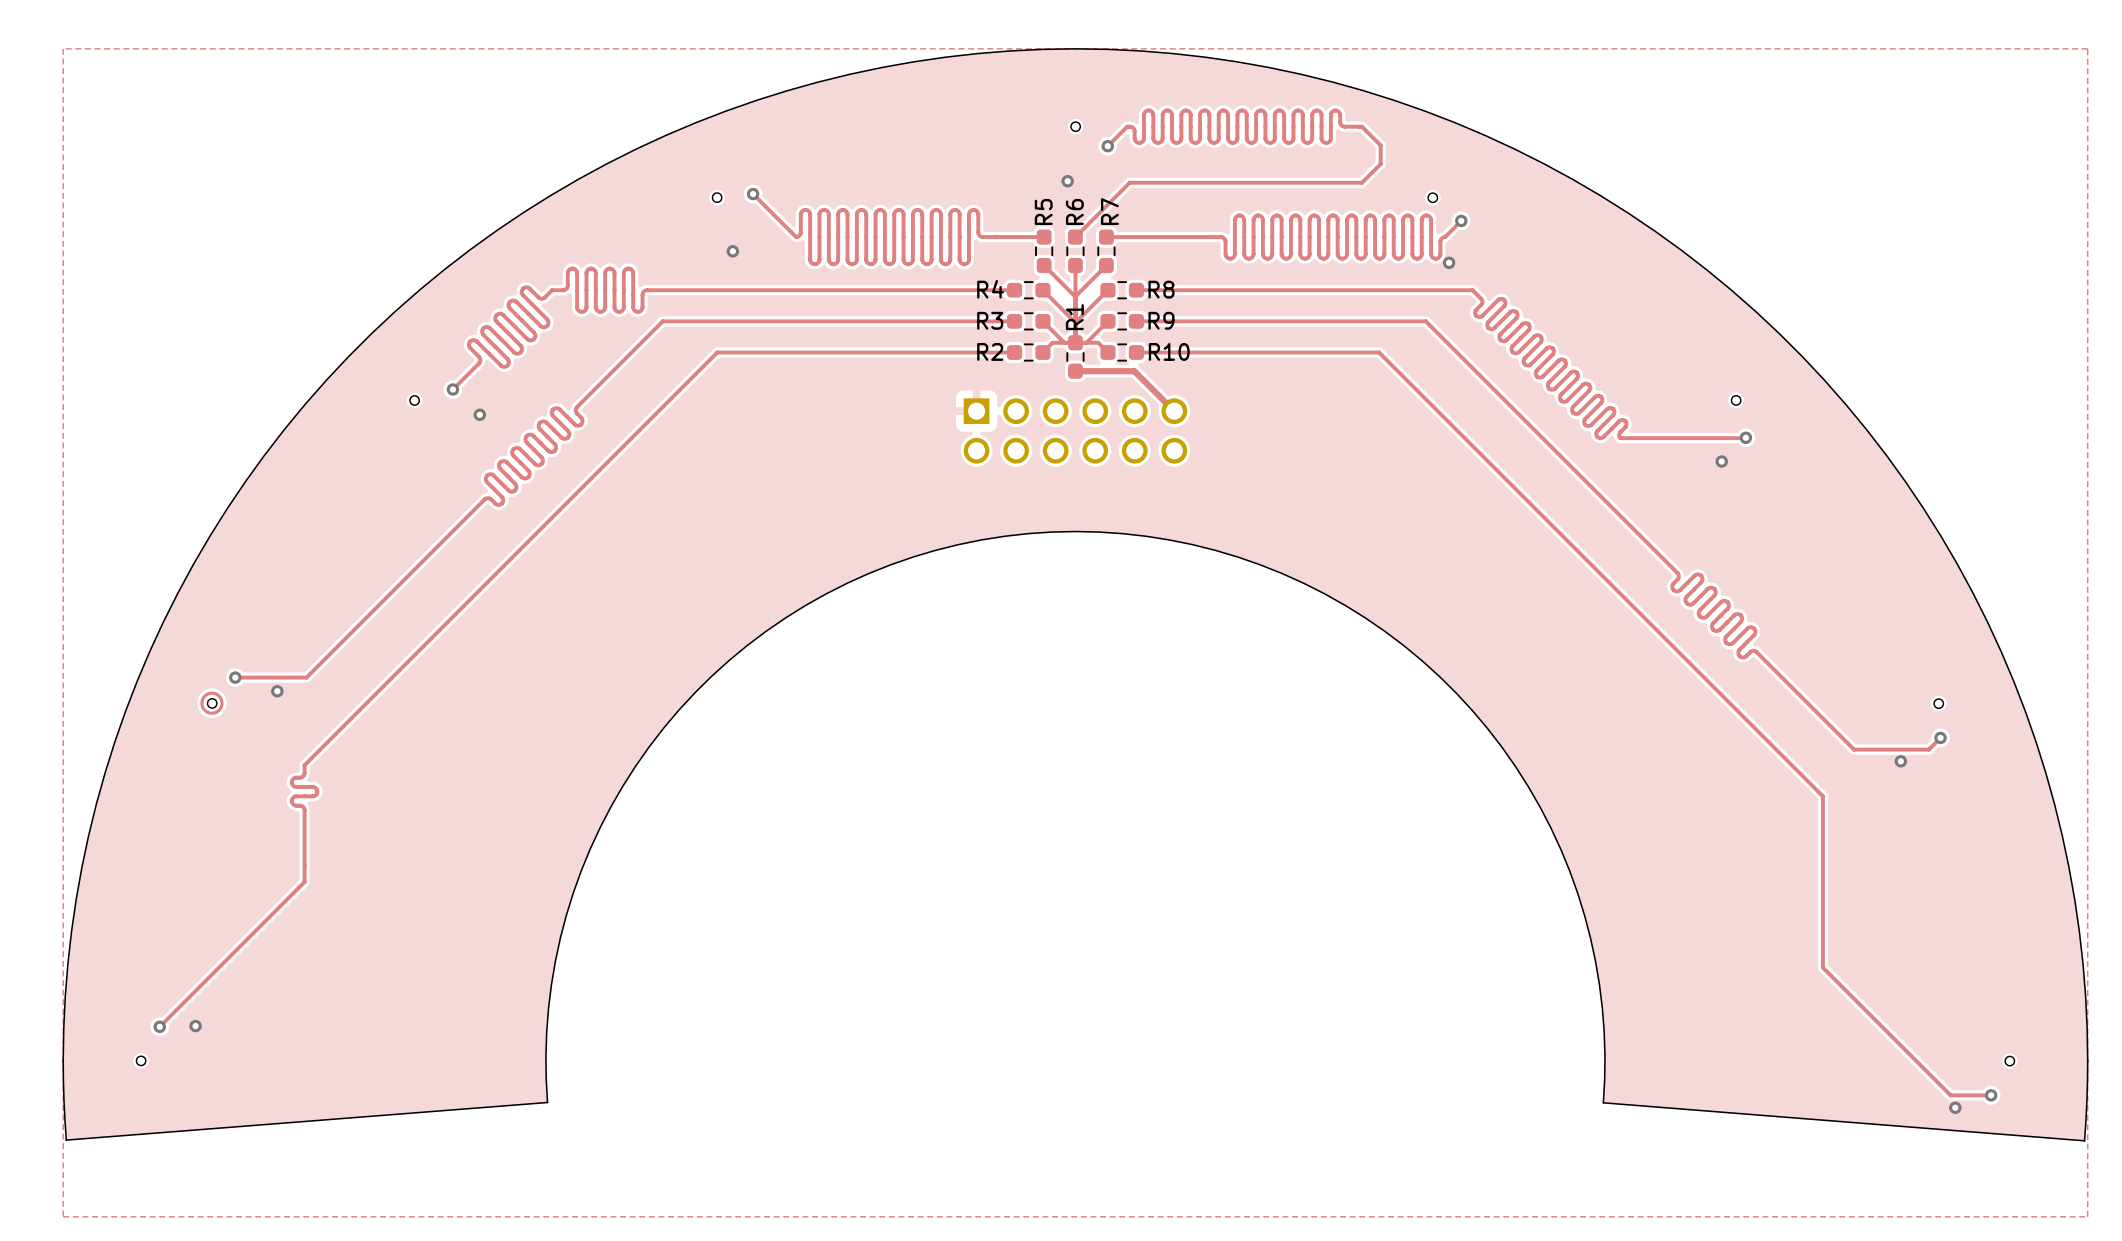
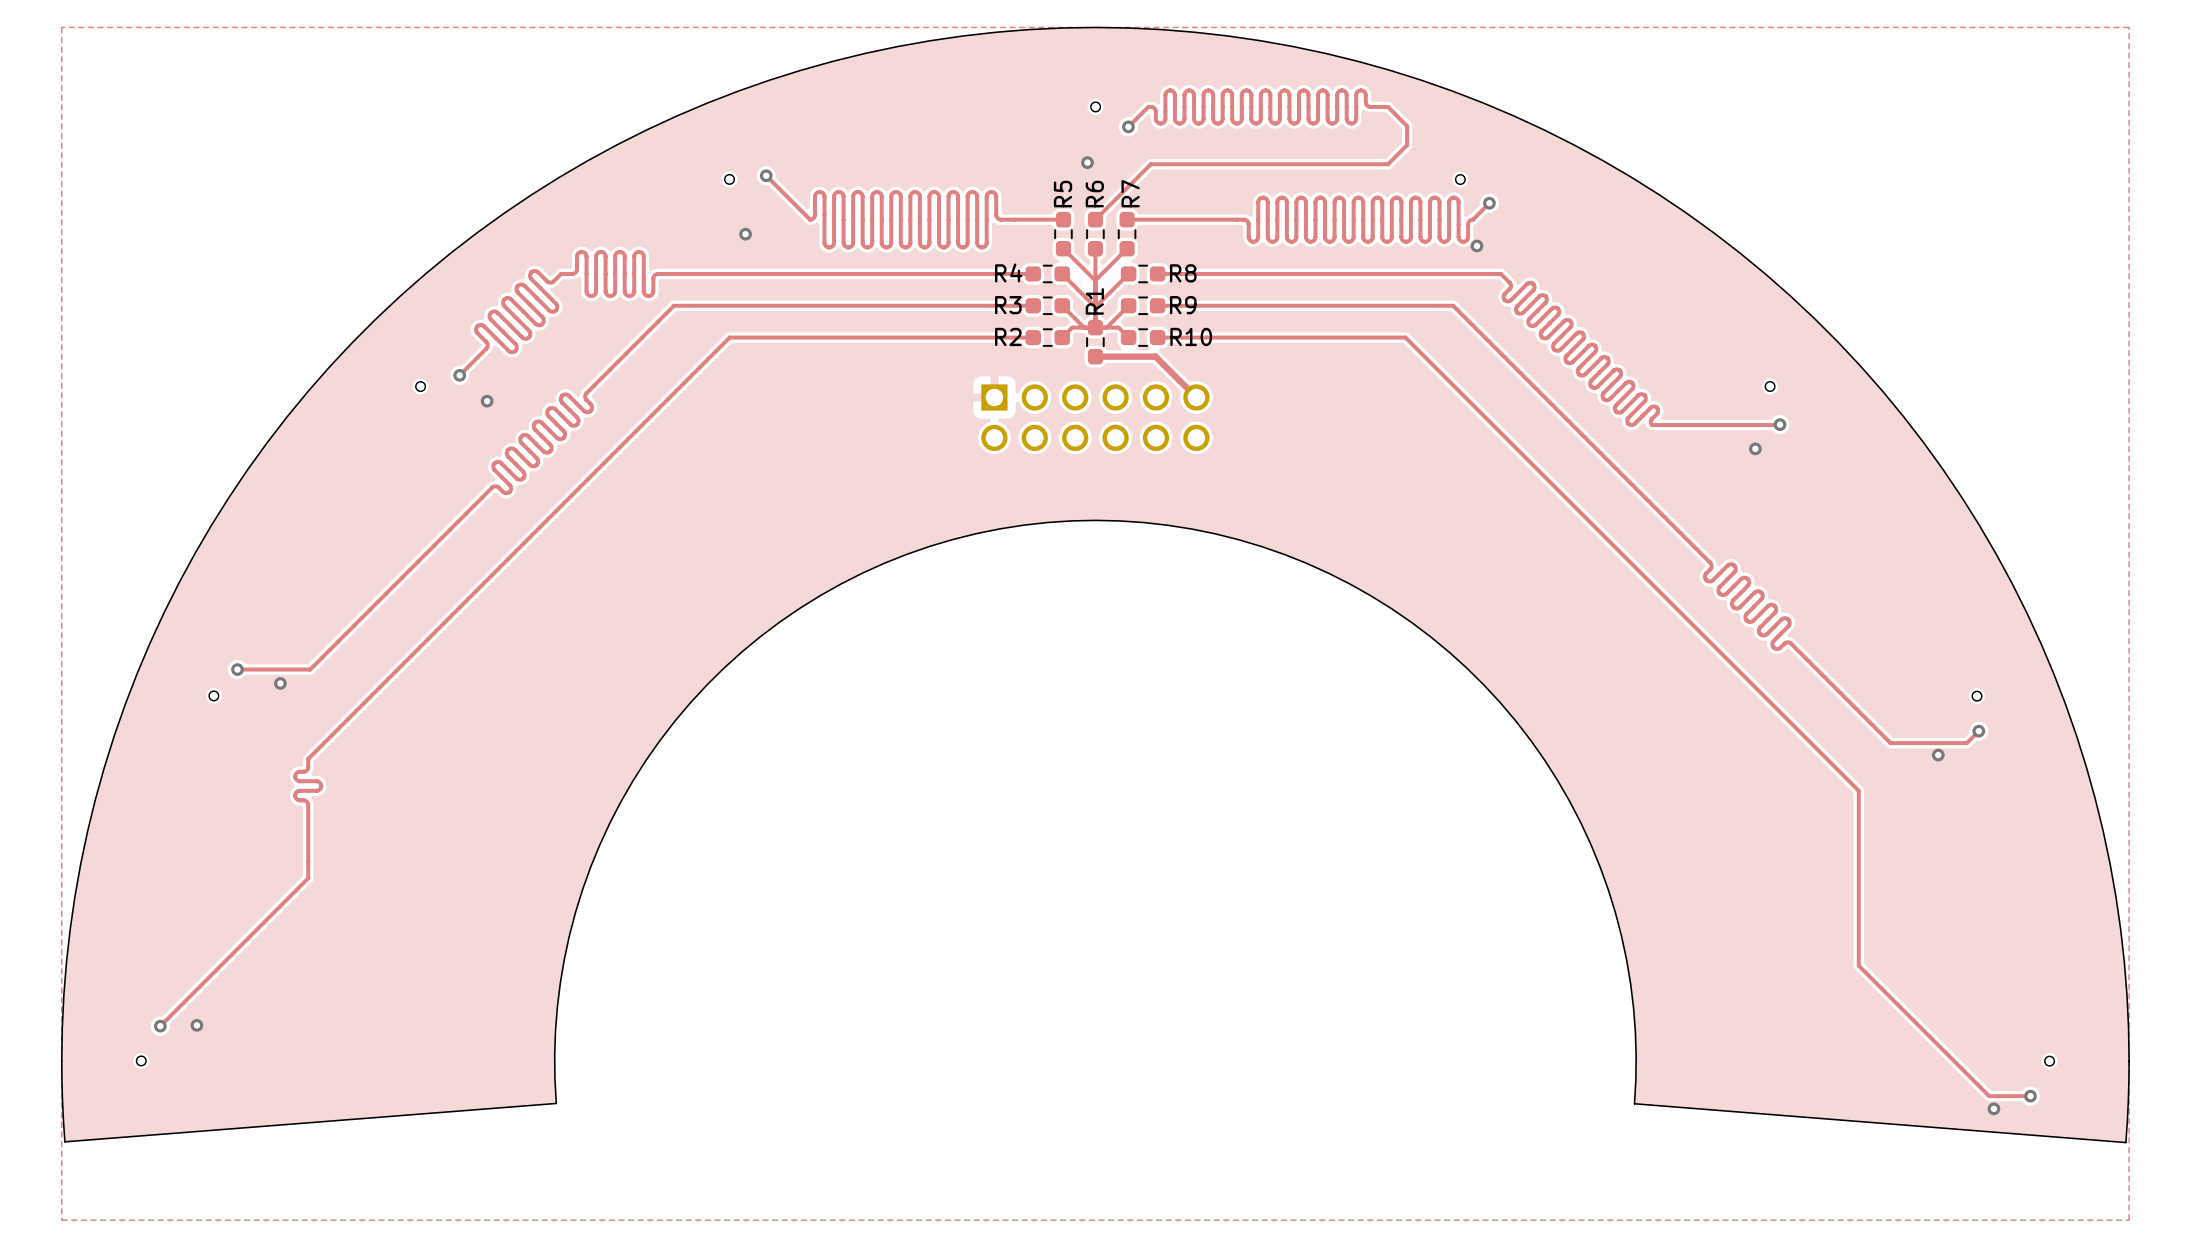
drawing: [200, 691, 224, 715] -> none

